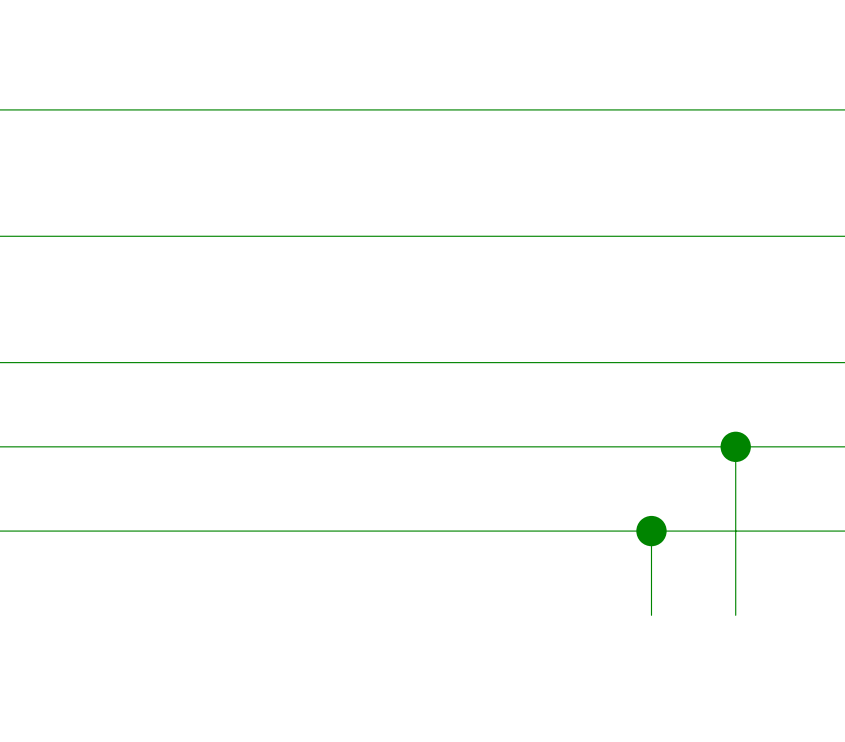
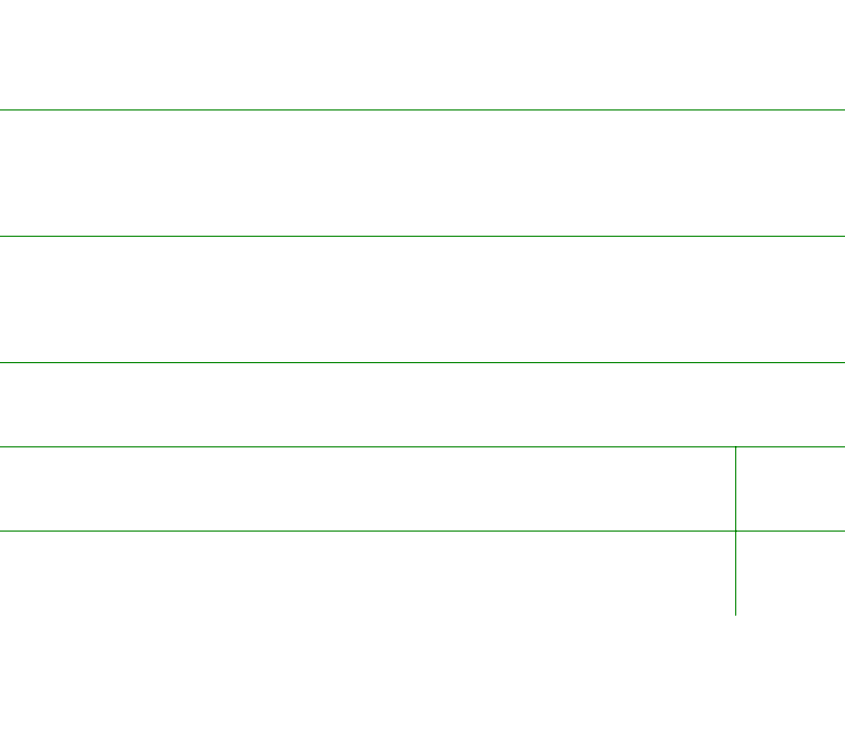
junction: (735, 446) -> none
wire: (651, 531) (651, 615) -> none
junction: (651, 531) -> none

